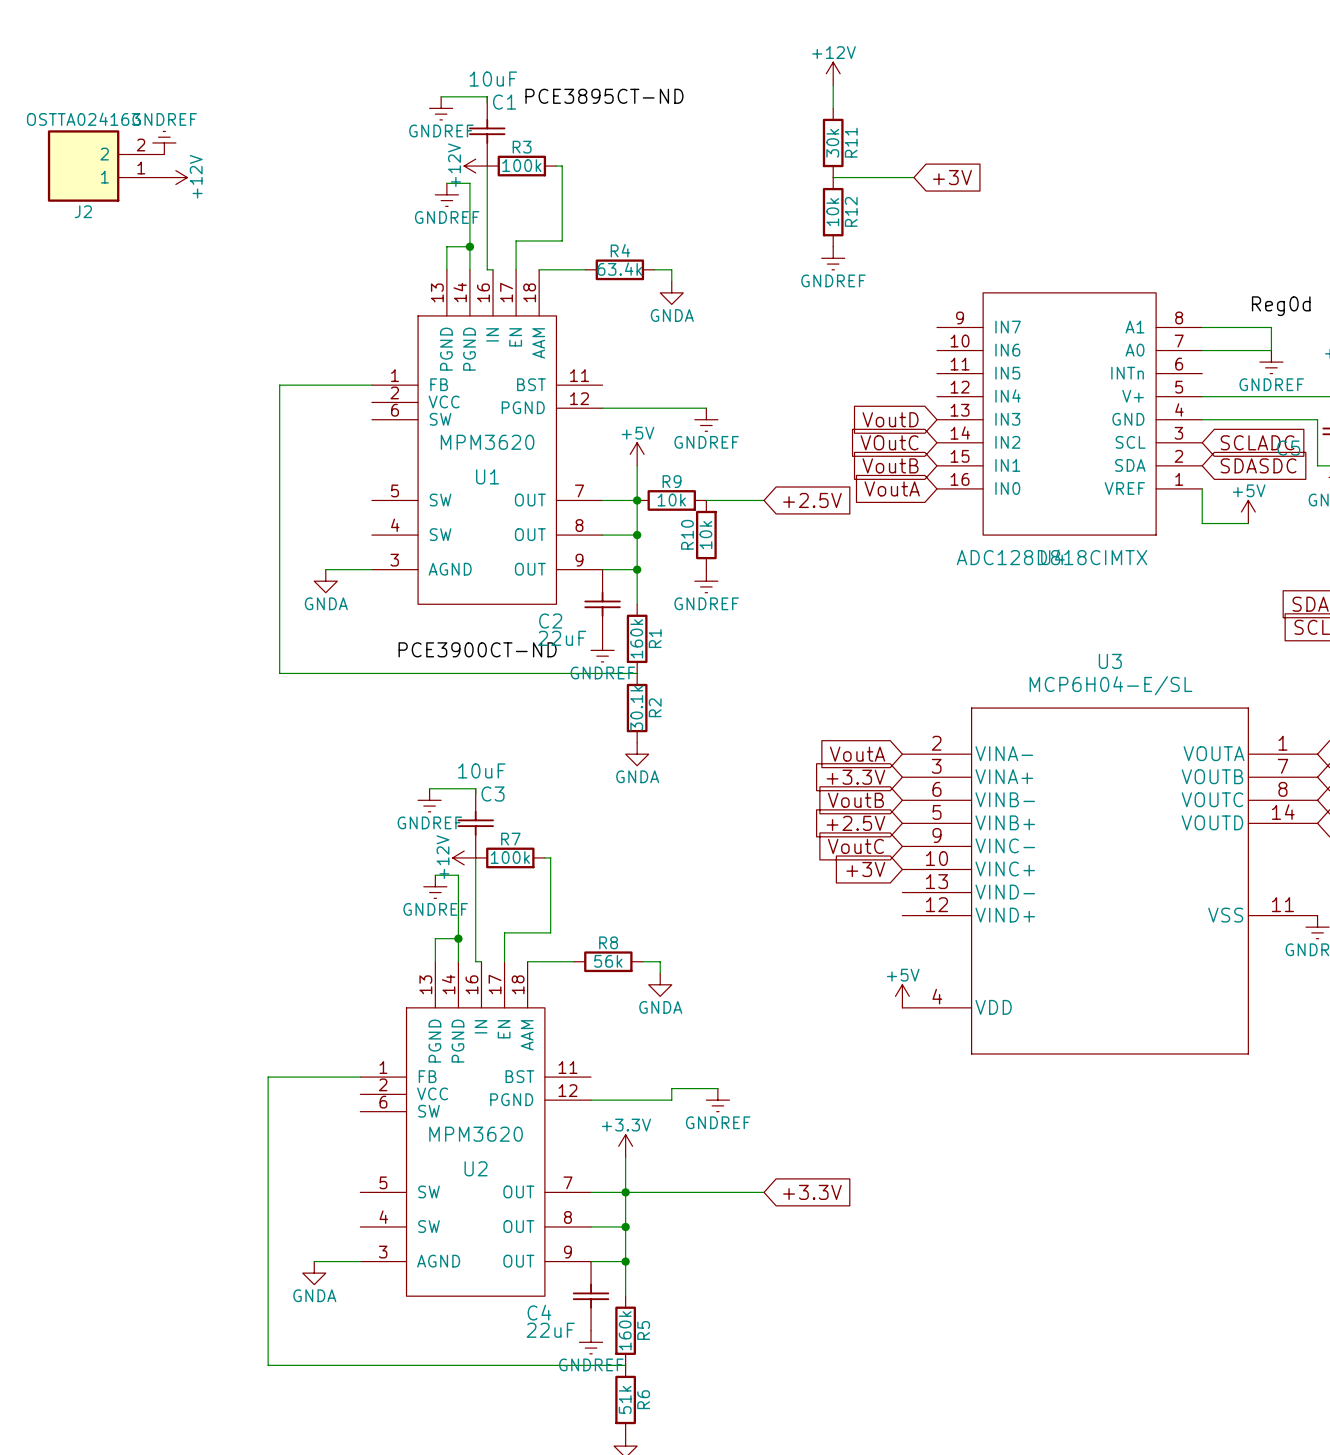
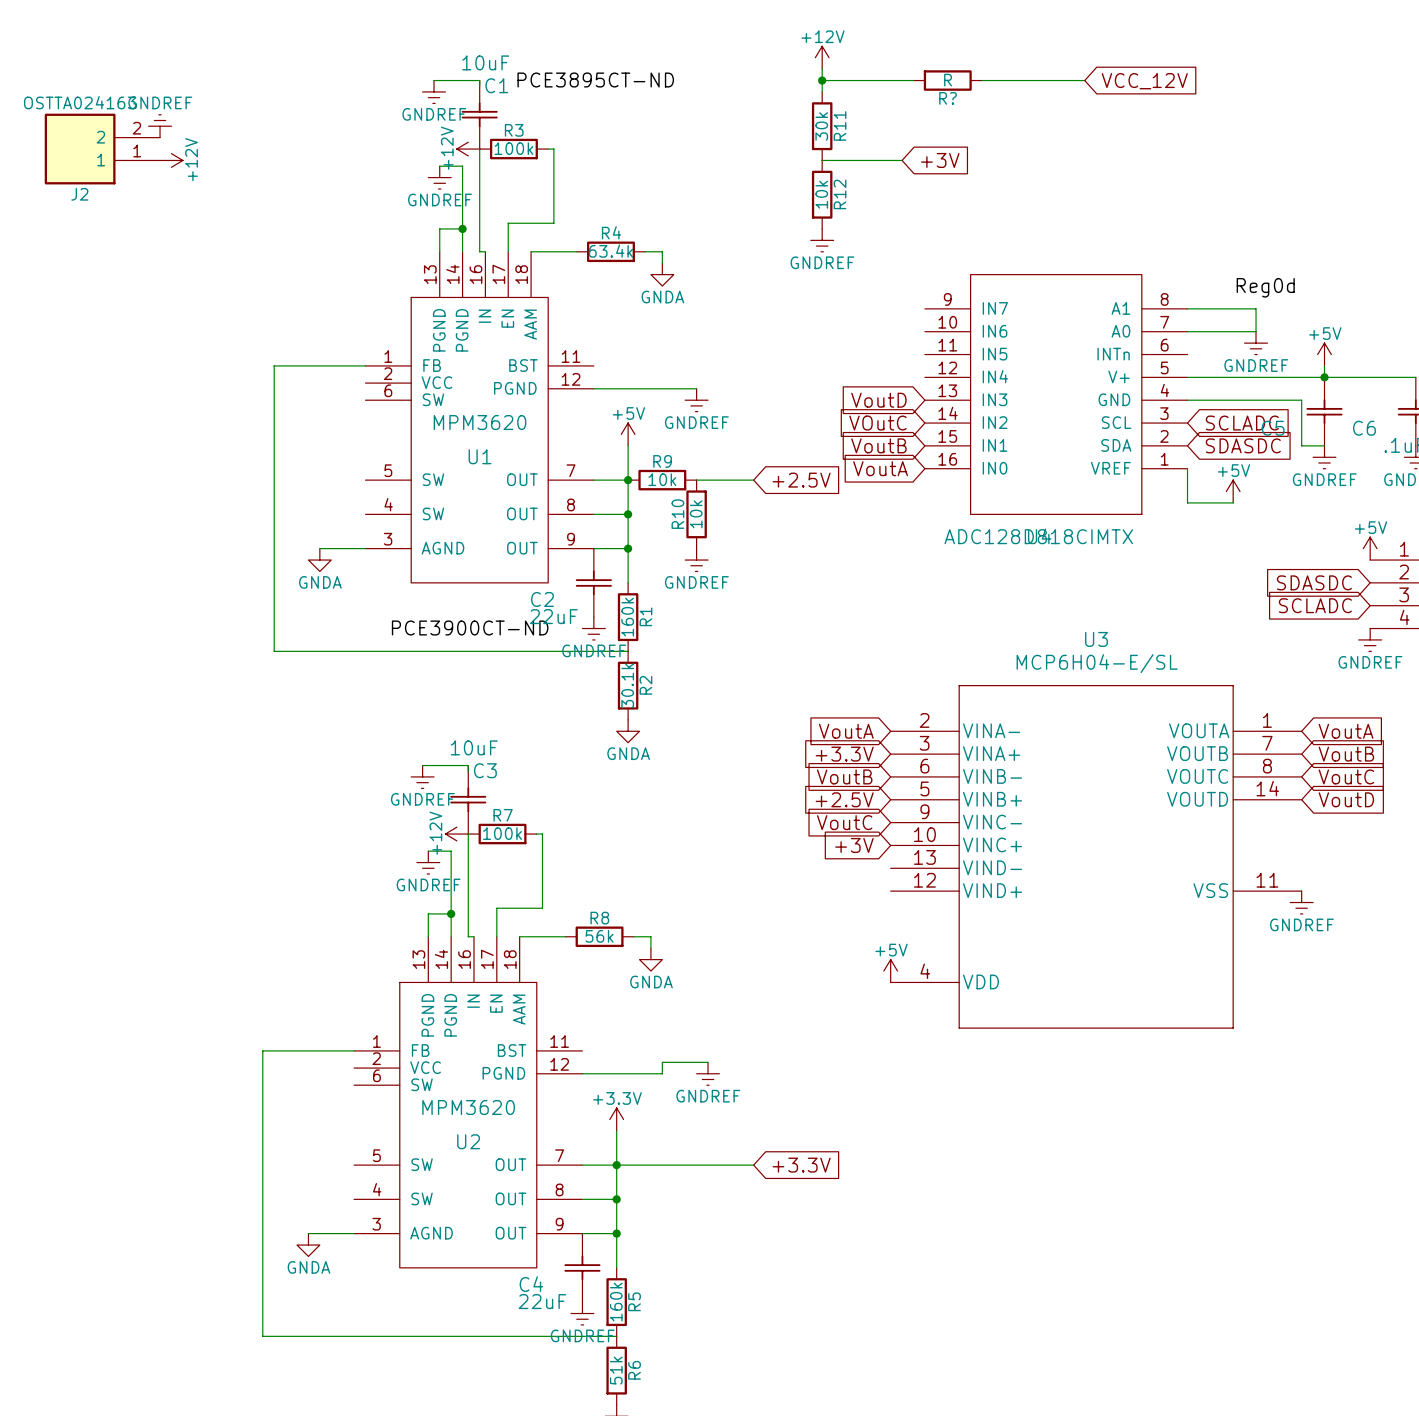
wire: none -> (822, 80) (913, 80)
junction: none -> (822, 80)
R?: none -> R (947, 80)
wire: none -> (982, 80) (1084, 80)
global label: none -> VCC_12V (1144, 81)

